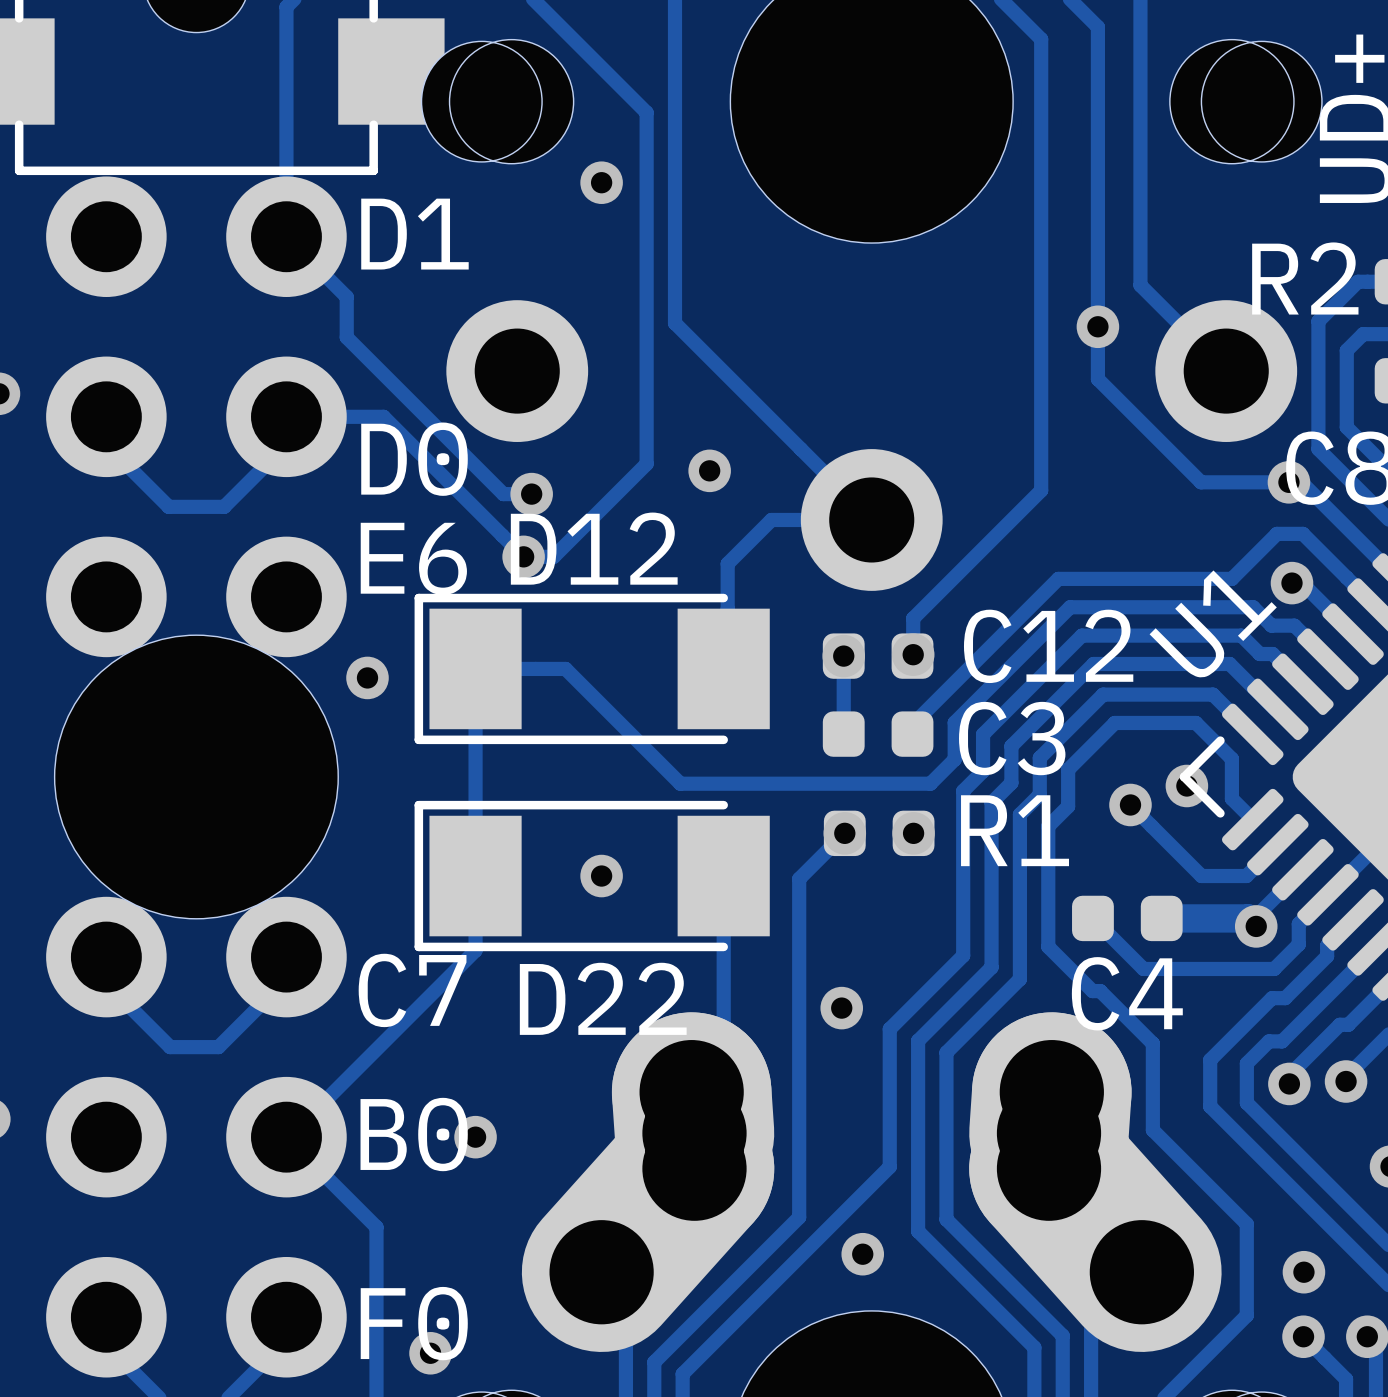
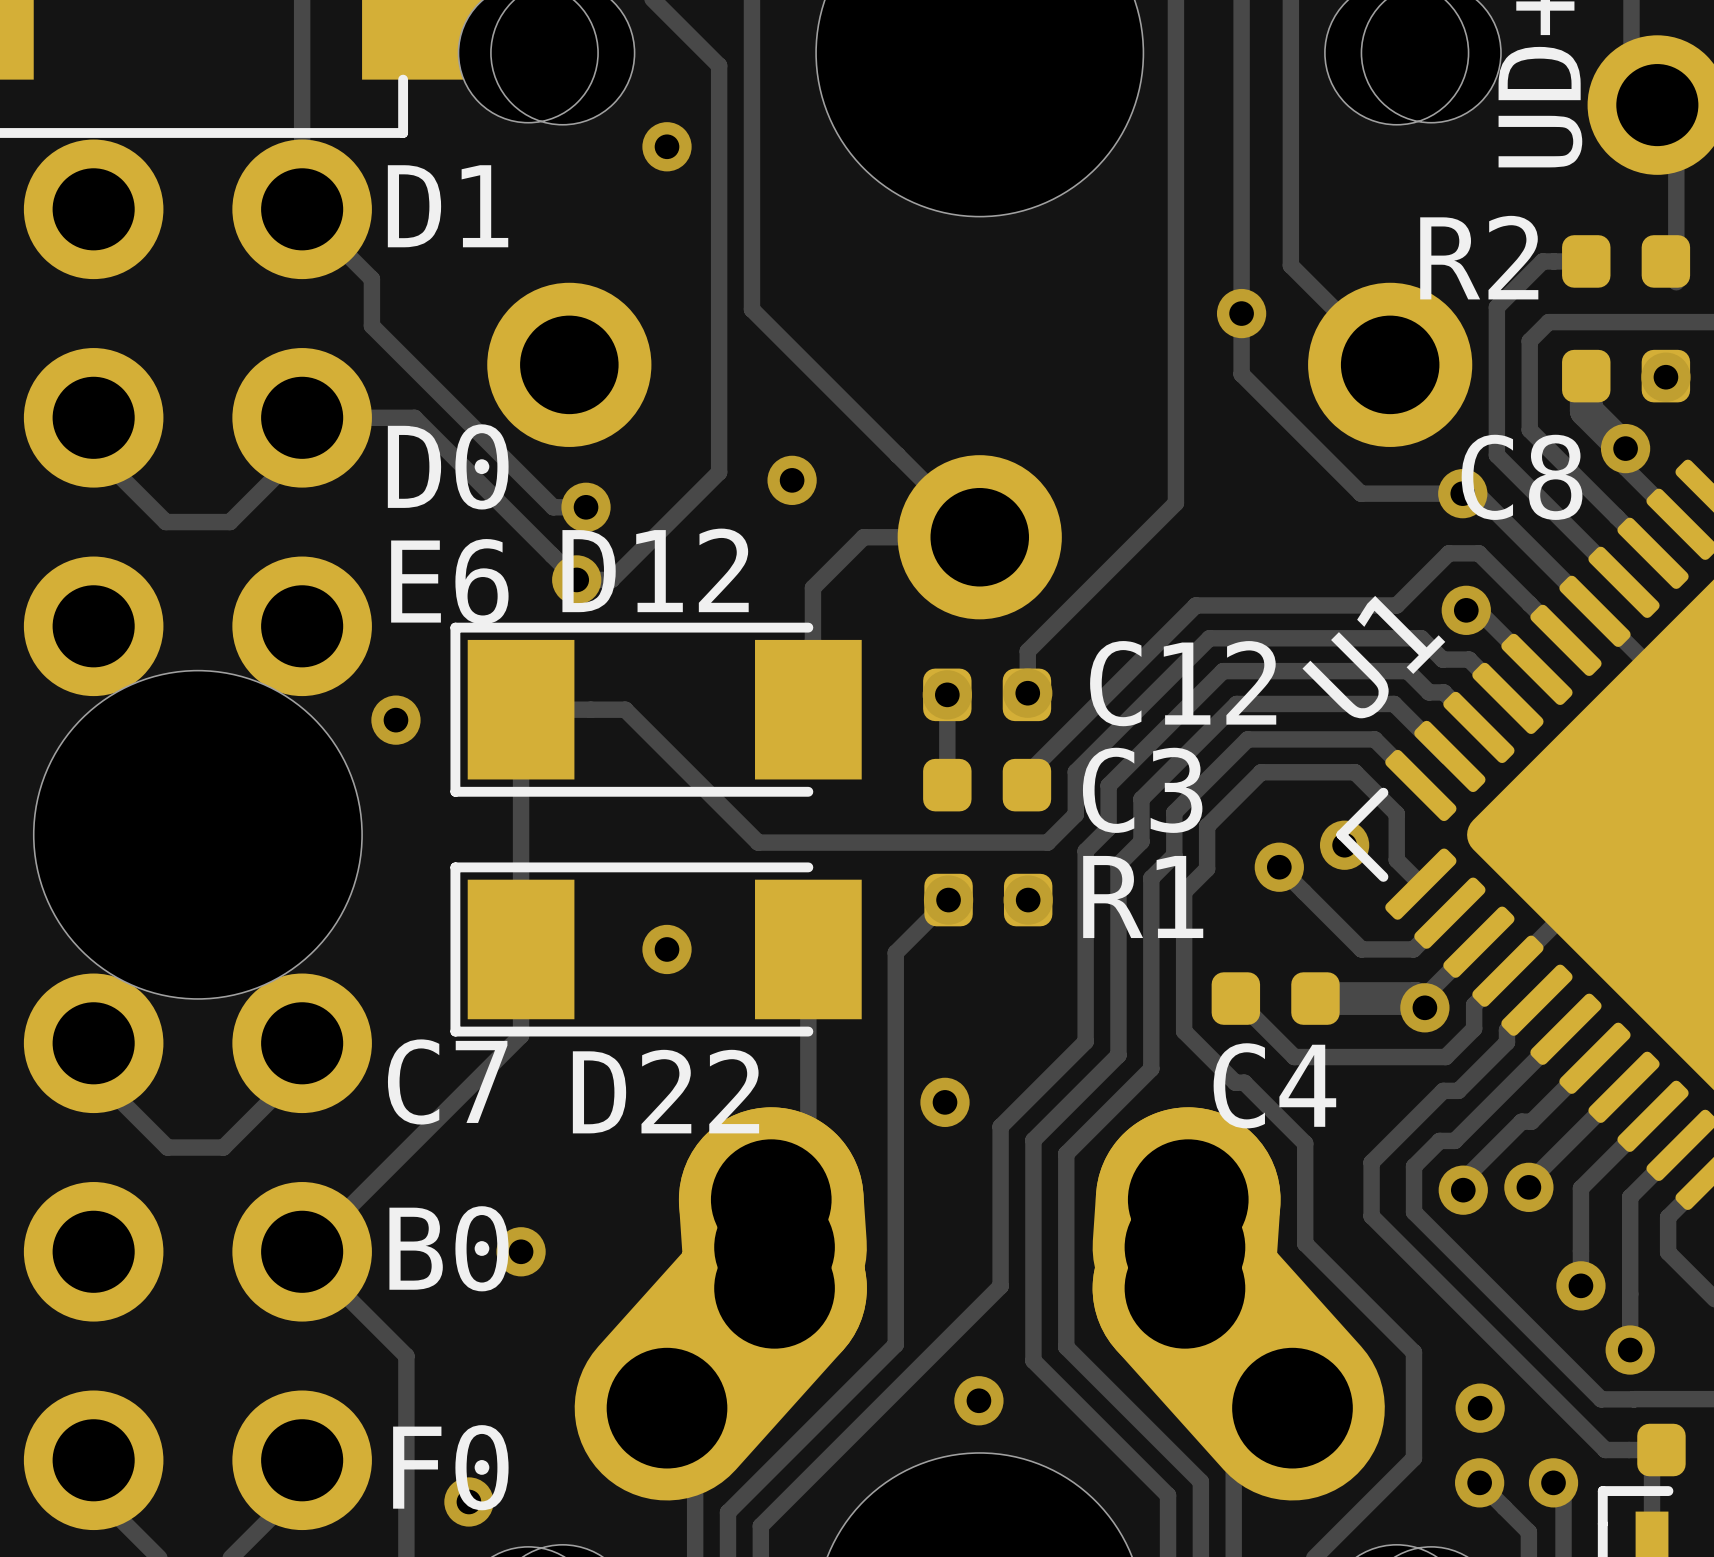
via position: (862, 1254) -> (978, 1400)

